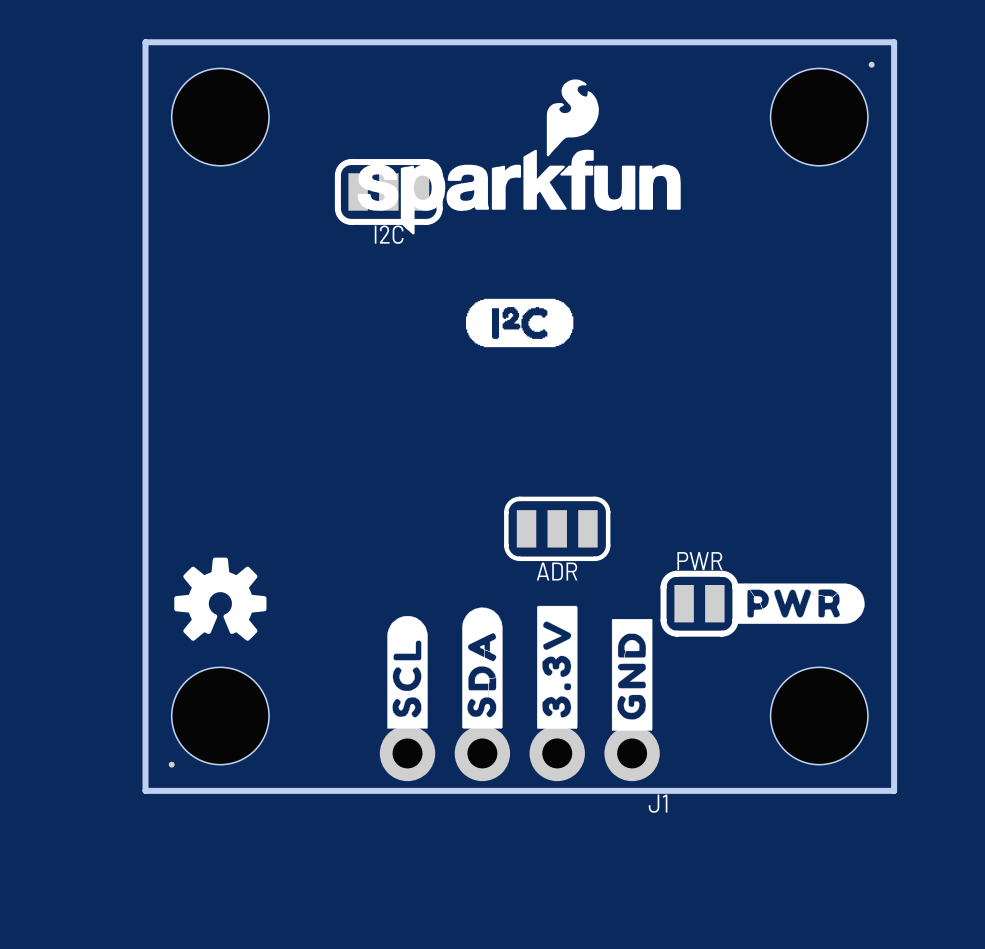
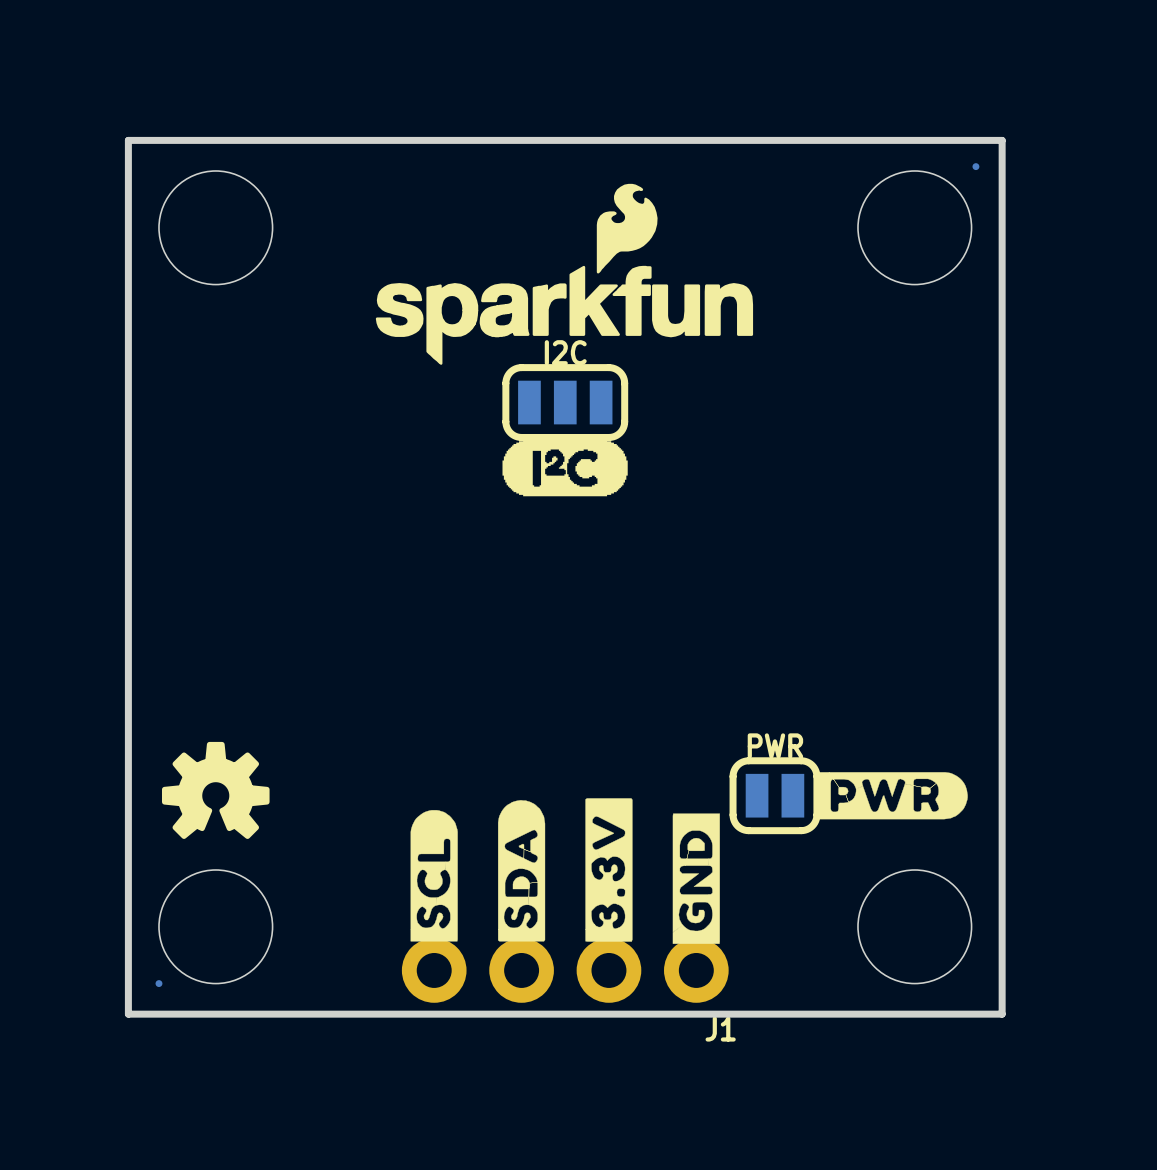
I2C position: (388, 191) -> (565, 402)
I2C name position: I2C (389, 234) -> I2C (565, 352)
ADR: (557, 528) -> none

